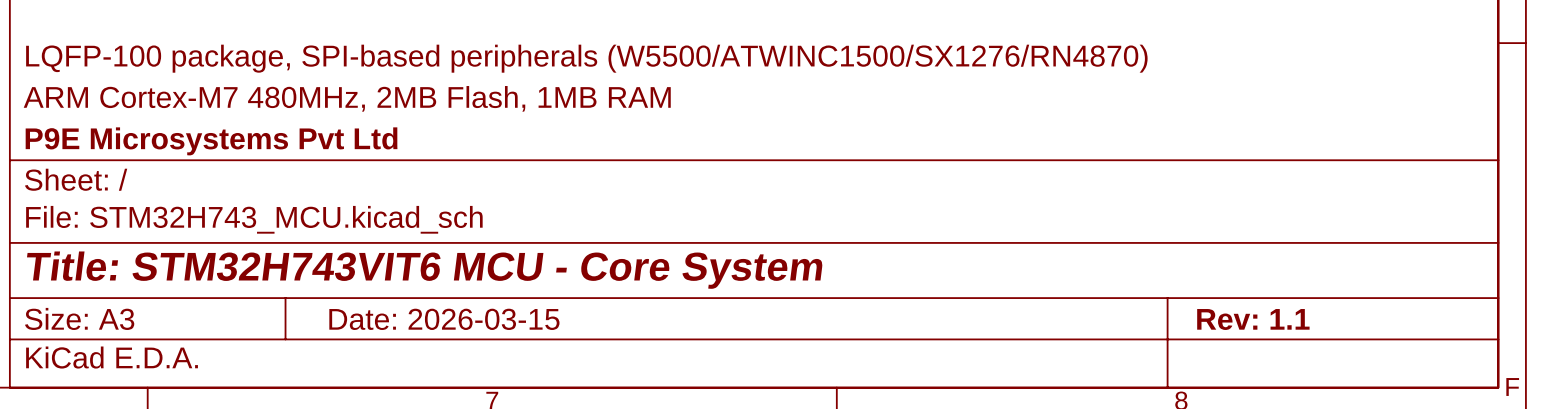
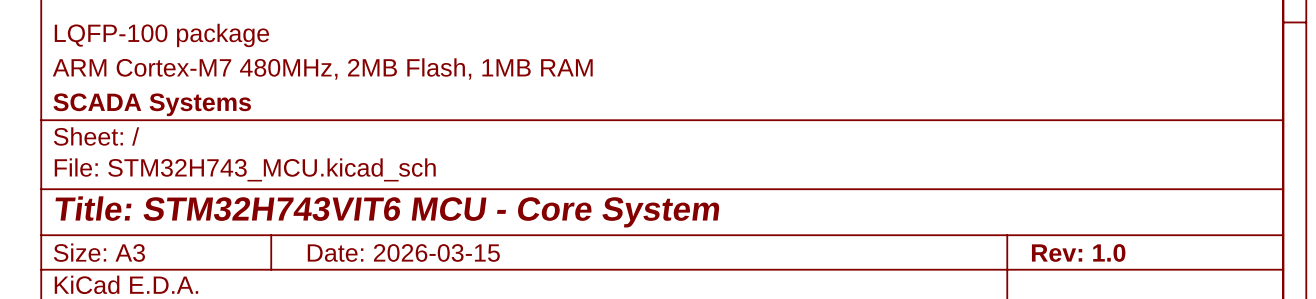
title block: LQFP-100 package, SPI-based peripherals (W5500/ATWINC1500/SX1276/RN4870) (586, 58) -> LQFP-100 package (161, 35)
title block: P9E Microsystems Pvt Ltd (211, 141) -> SCADA Systems (152, 104)
title block: Rev: 1.1 (1253, 319) -> Rev: 1.0 (1078, 252)

